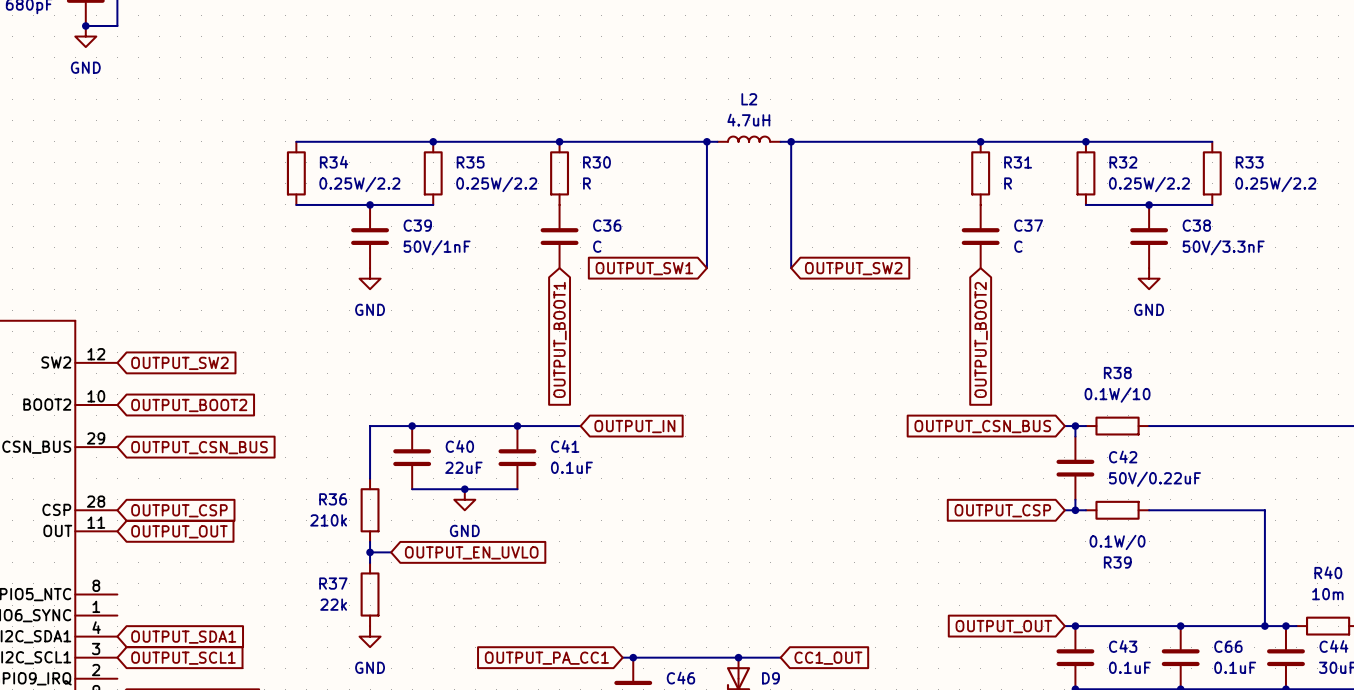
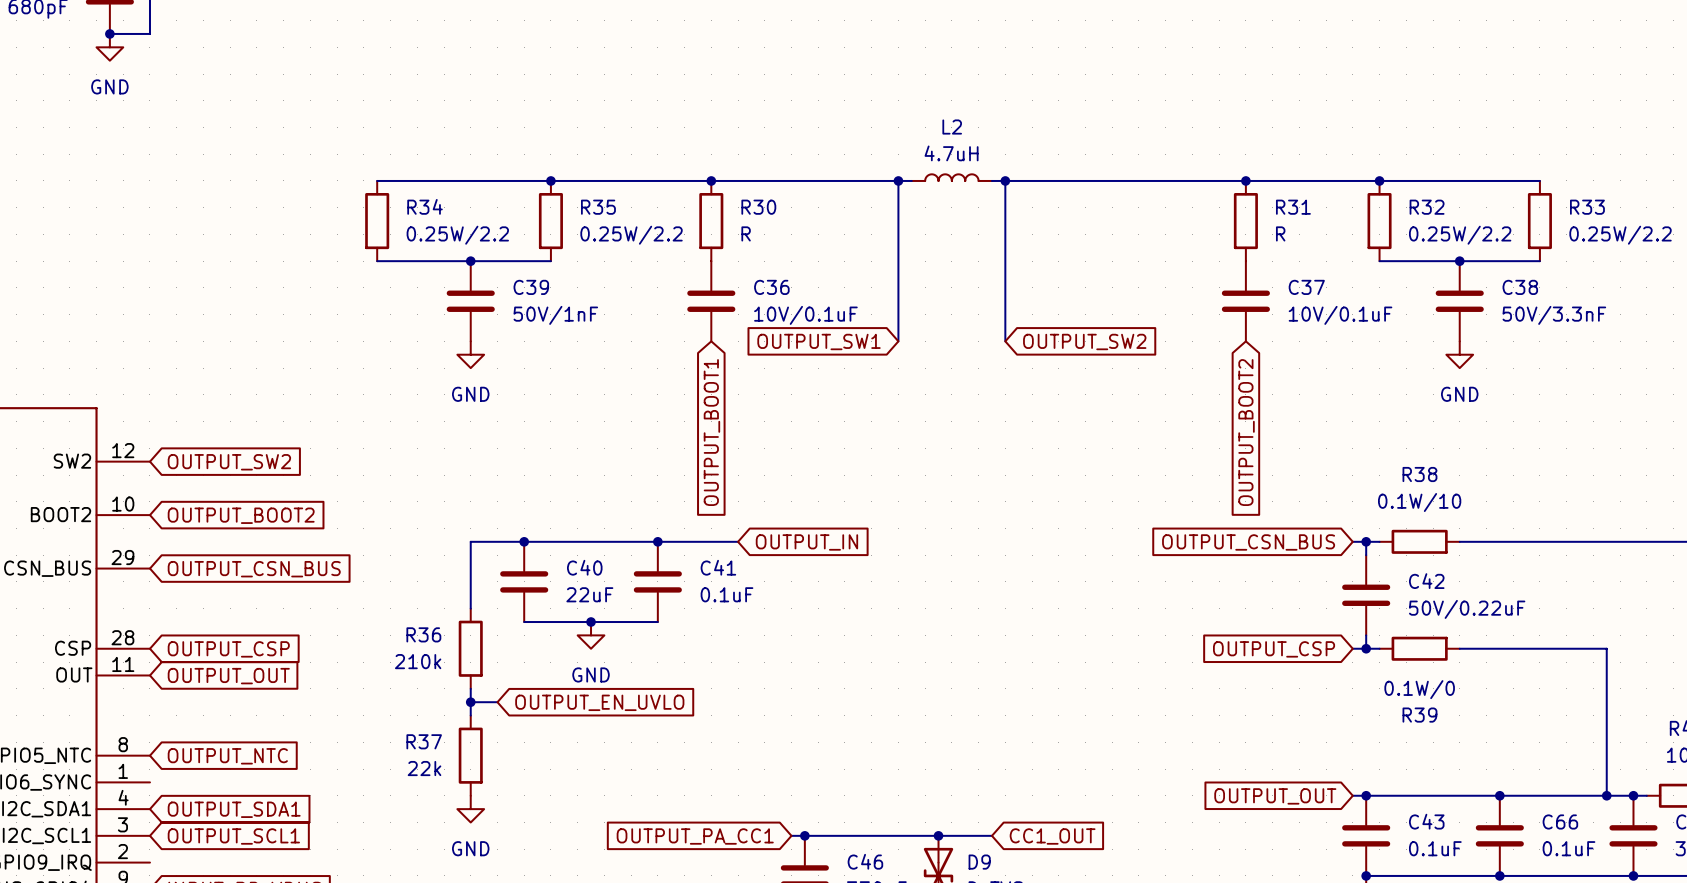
C36 value: C (597, 246) -> 10V/0.1uF (805, 315)
C37 value: C (1018, 246) -> 10V/0.1uF (1340, 315)
global label: none -> OUTPUT_NTC (227, 756)

